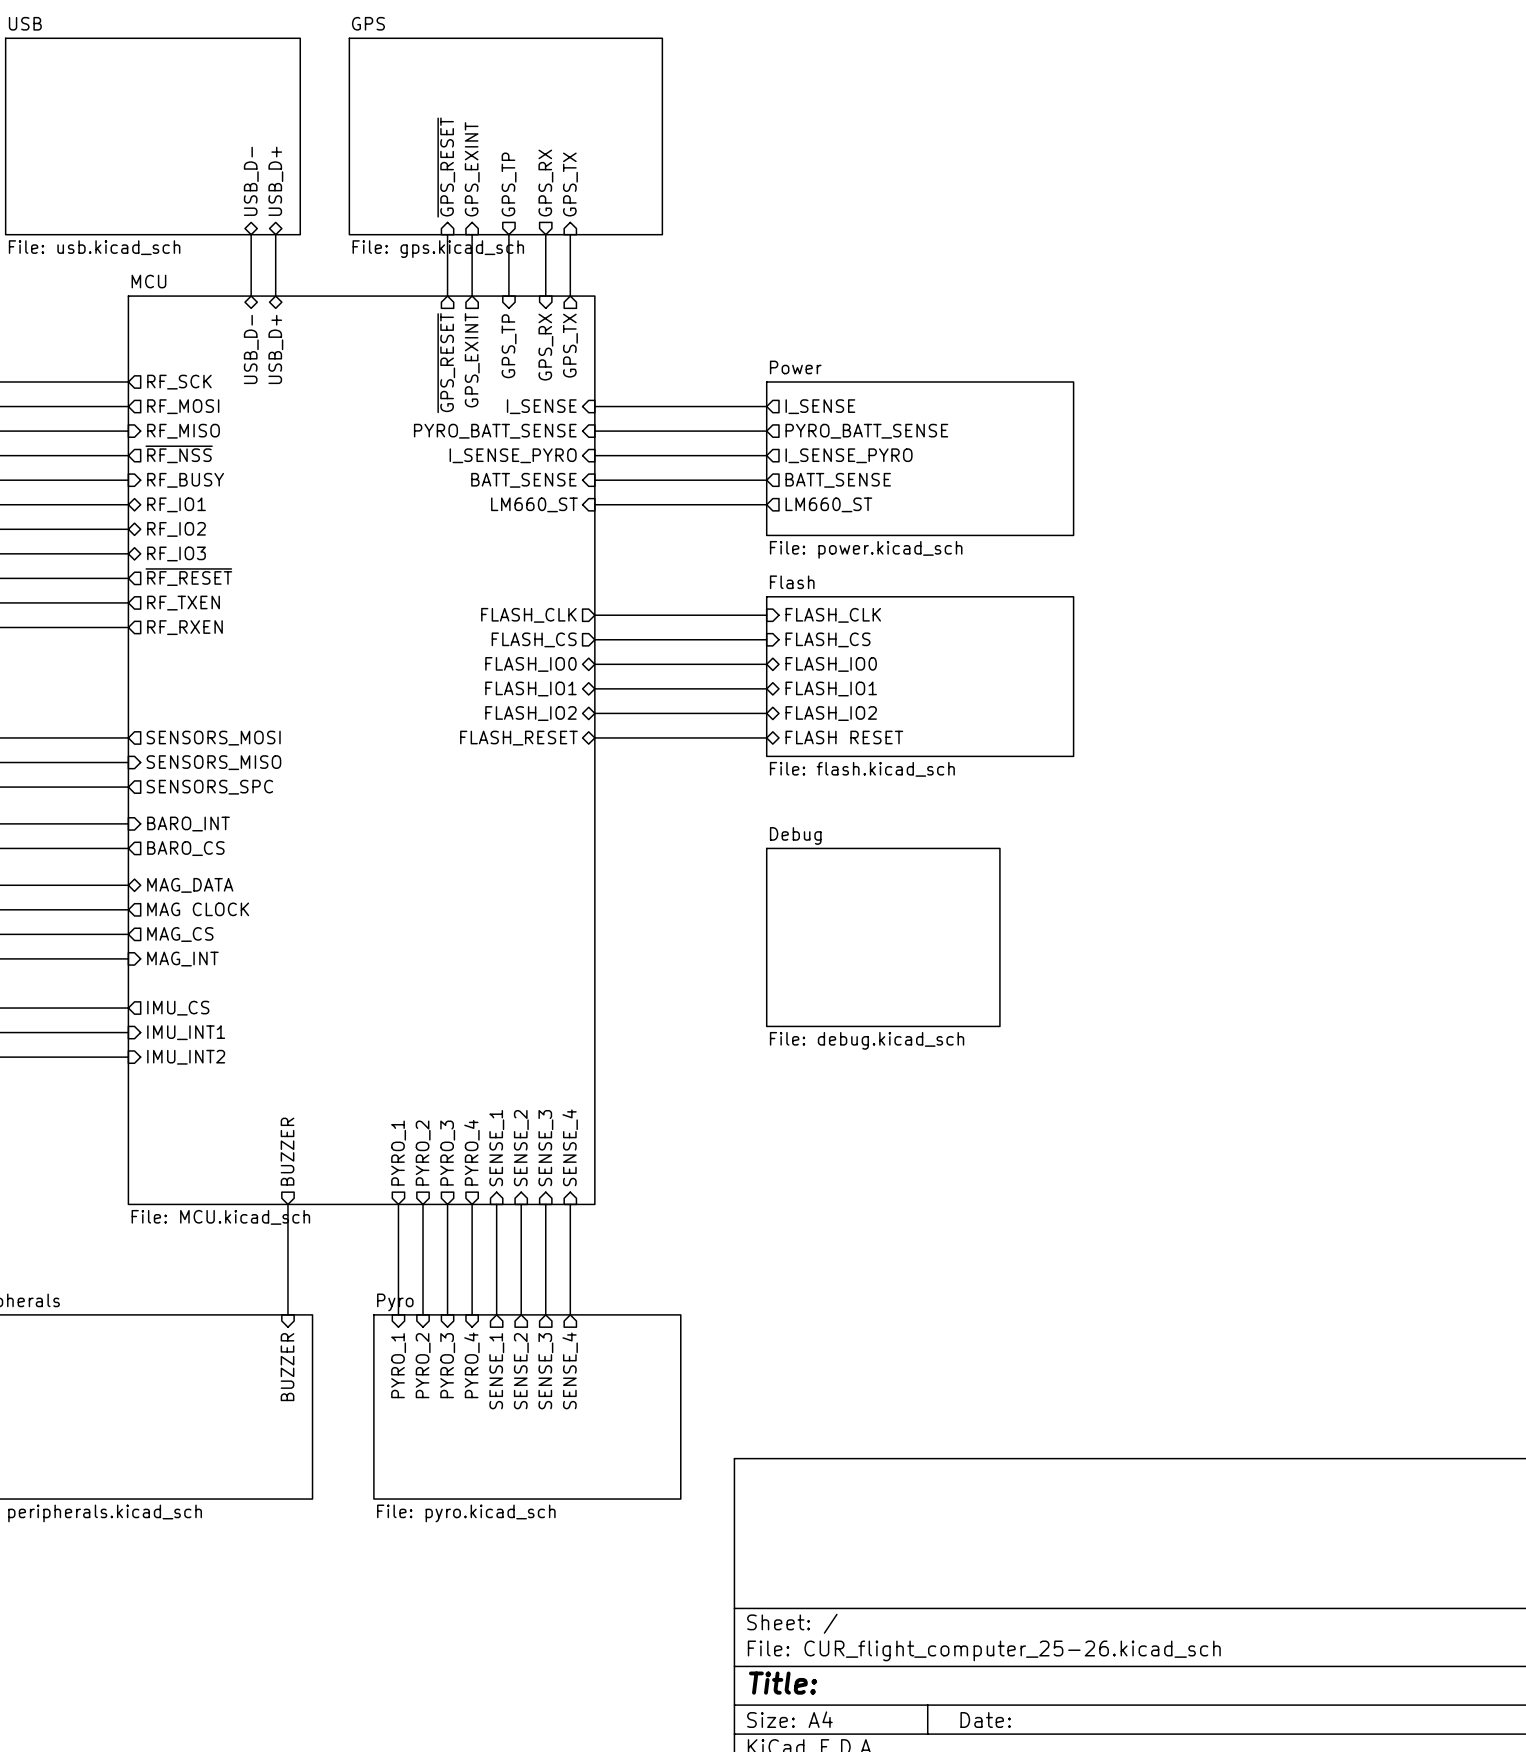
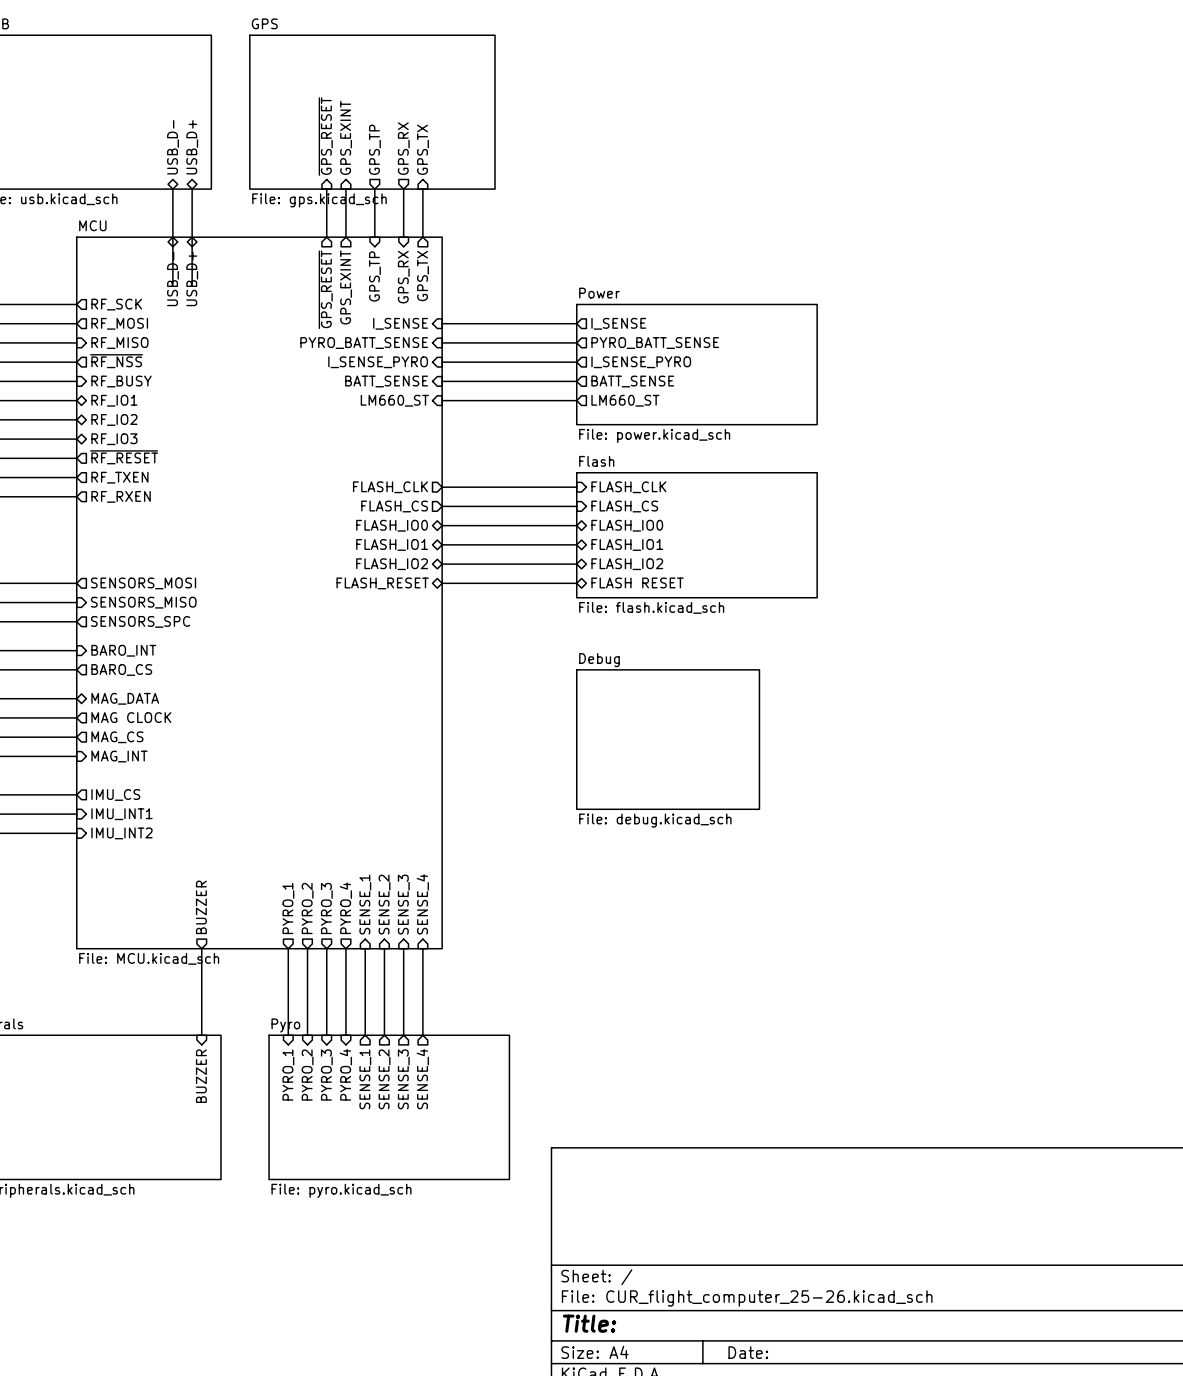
wire: none -> (172, 237) (172, 285)
wire: none -> (192, 237) (192, 285)

